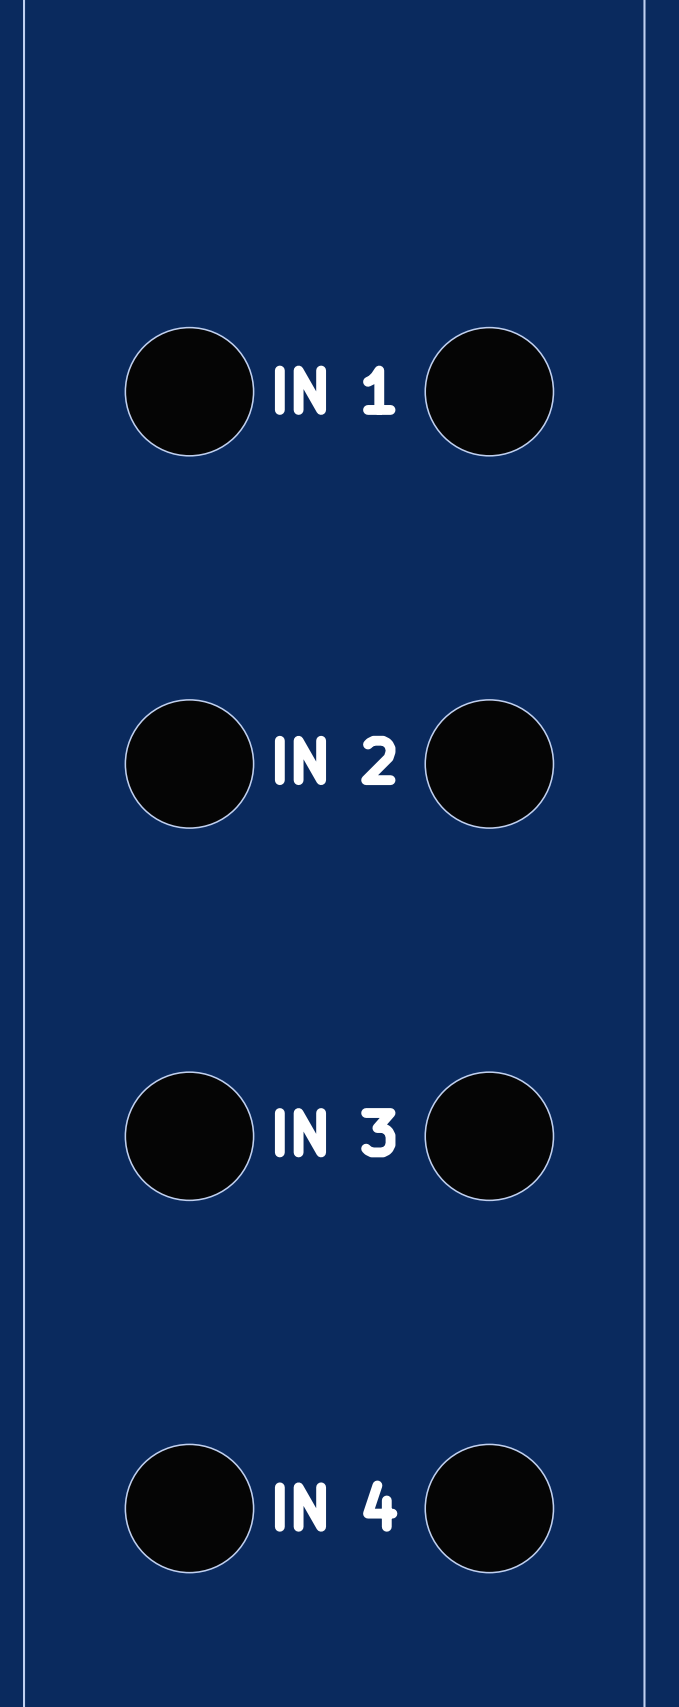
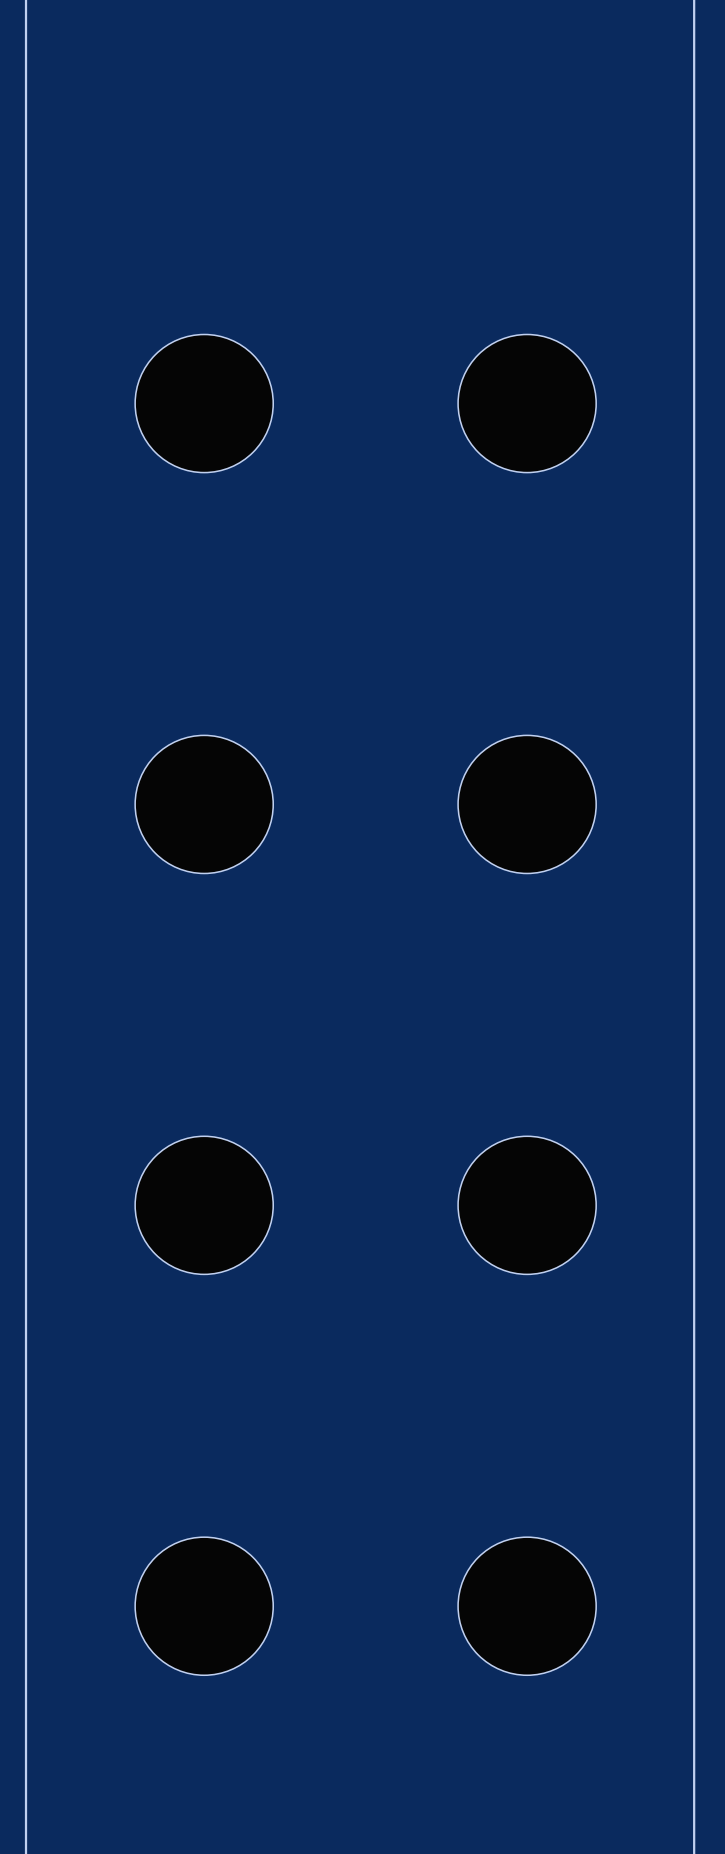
text: IN 1 (335, 390) -> none
text: IN 2 (335, 760) -> none
text: IN 3 (335, 1132) -> none
text: IN 4 (336, 1506) -> none

